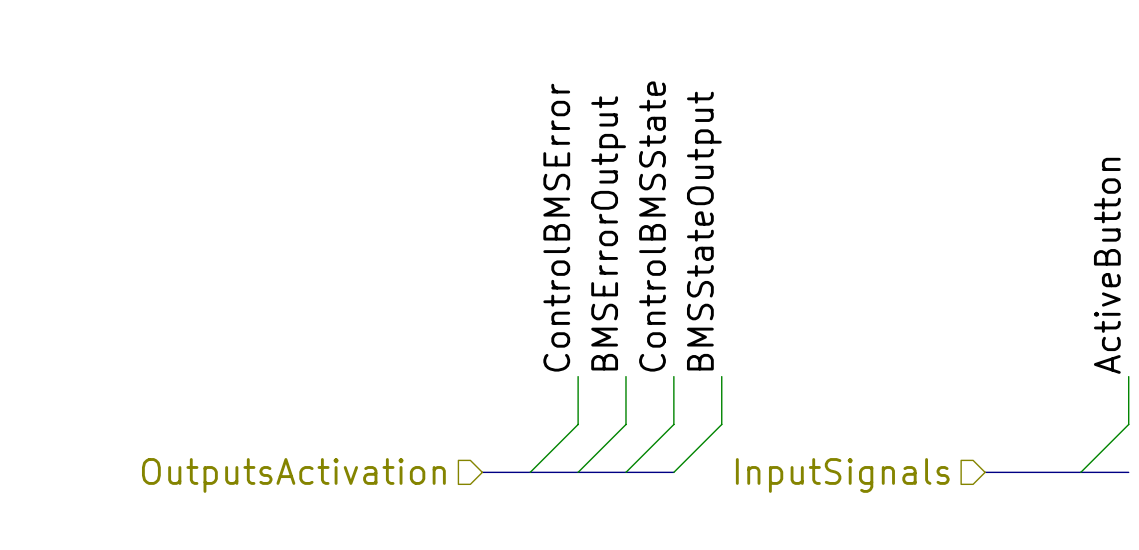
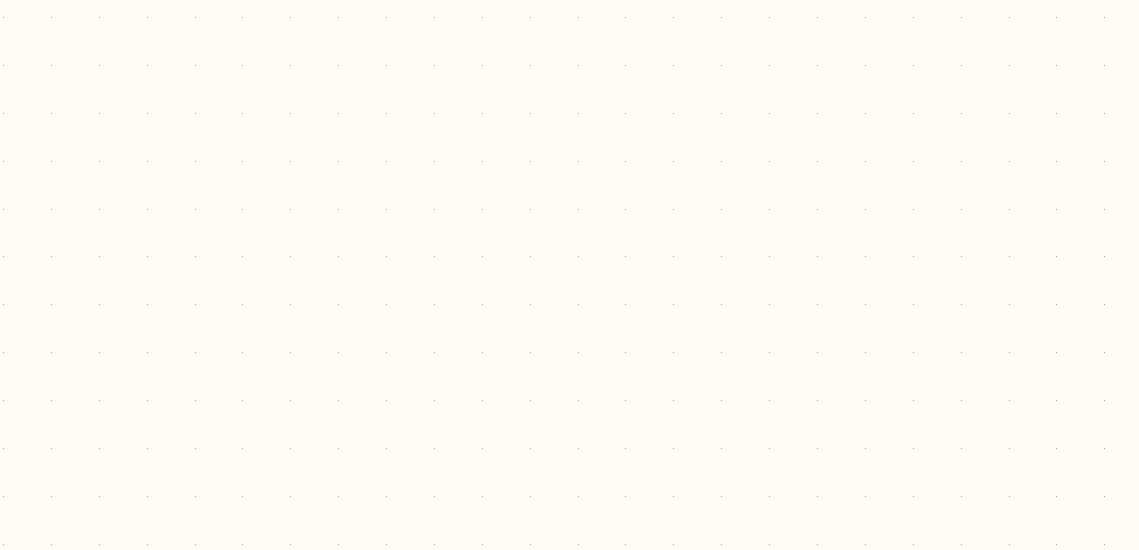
label: ControlBMSState (652, 226) -> none
label: ControlBMSError (556, 227) -> none
label: BMSStateOutput (704, 231) -> none
label: BMSErrorOutput (608, 233) -> none
label: ActiveButton (1107, 265) -> none
wire: (578, 376) (578, 424) (530, 472) -> none
wire: (625, 376) (625, 424) (578, 472) -> none
wire: (673, 376) (673, 424) (625, 472) -> none
wire: (721, 376) (721, 424) (673, 472) -> none
wire: (1128, 376) (1128, 424) (1080, 472) -> none
bus: (482, 472) (673, 472) -> none
bus: (985, 472) (1128, 472) -> none
hierarchical label: OutputsActivation (293, 475) -> none
hierarchical label: InputSignals (842, 475) -> none

